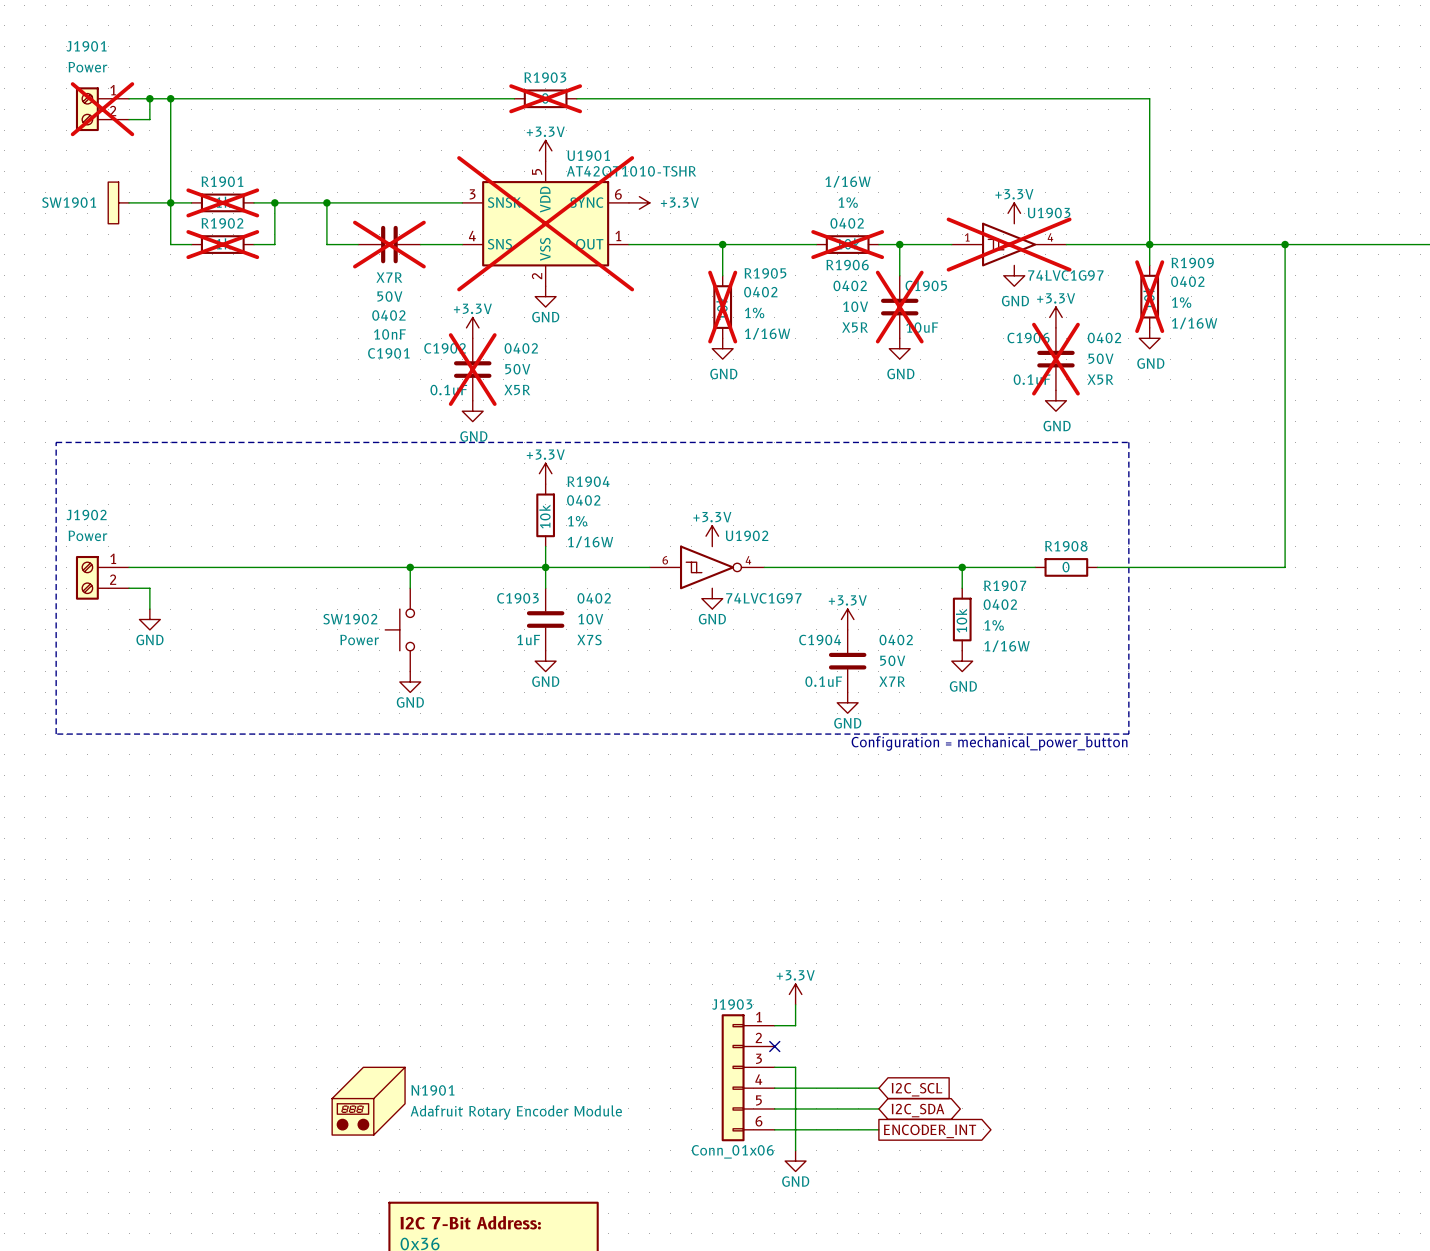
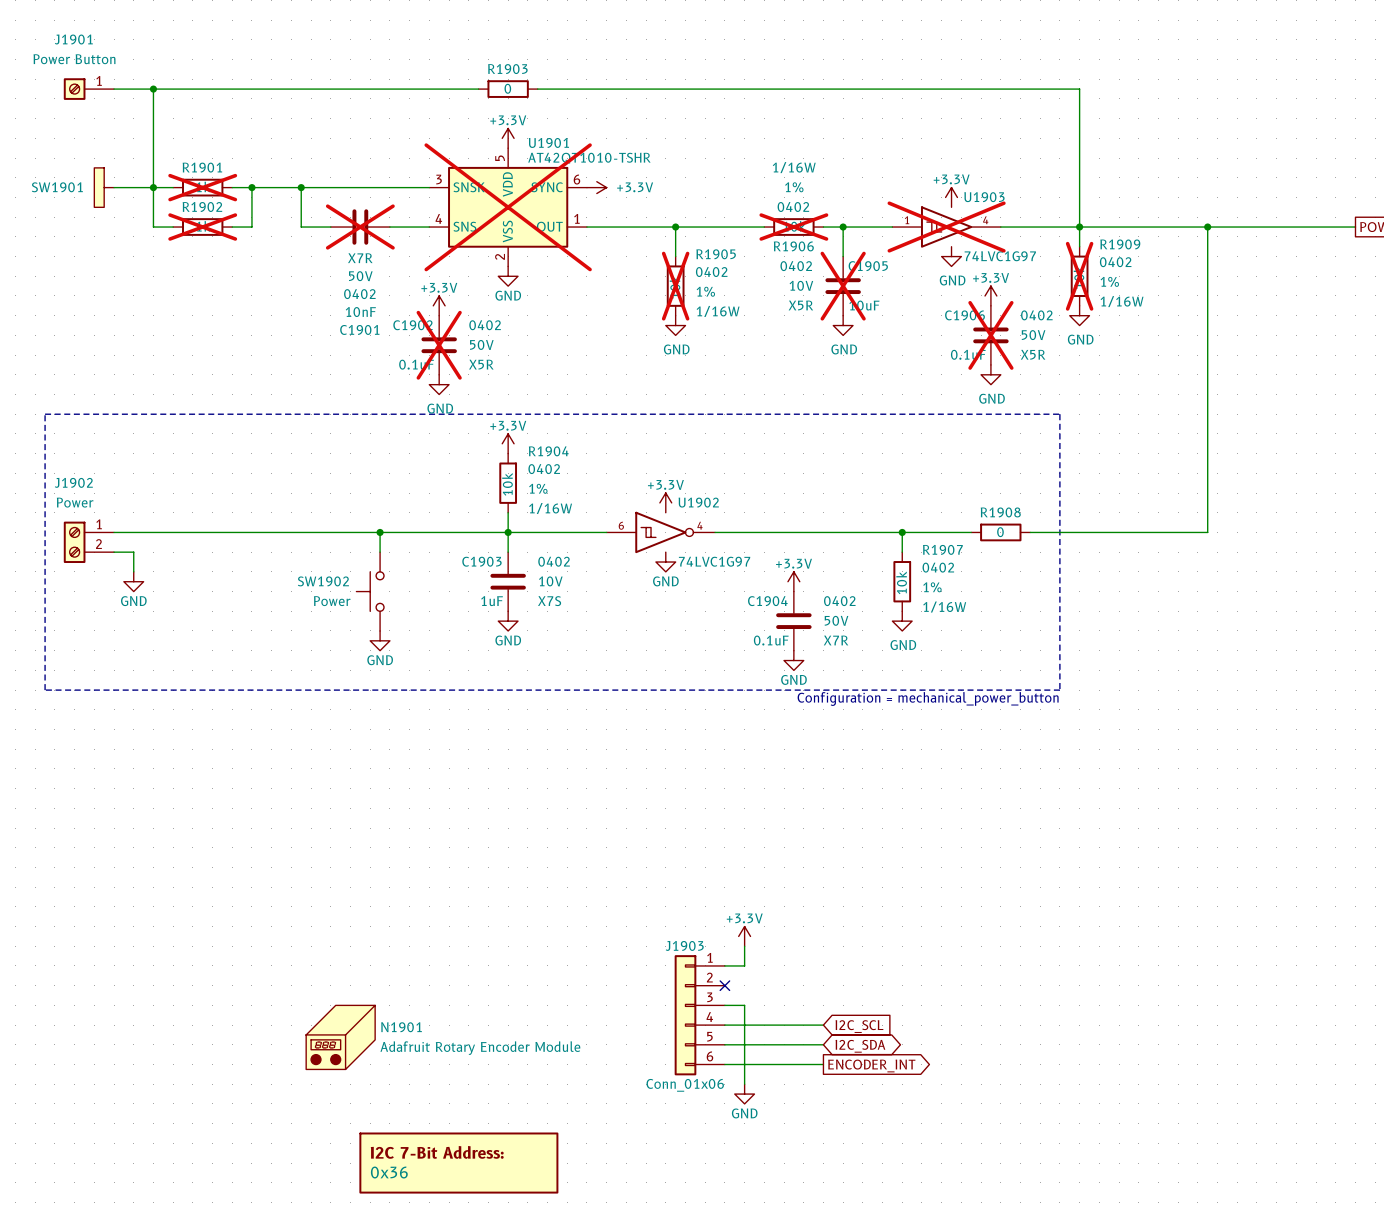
J1901 value: Power (87, 67) -> Power Button (74, 59)
J1901 symbol: [75, 87, 130, 132] -> [63, 78, 115, 100]
wire: (149, 98) (149, 119) (129, 119) -> none
junction: (149, 98) -> none
R1903 do-not-place cross: (545, 98) -> none
J1901 do-not-place cross: (102, 109) -> none

